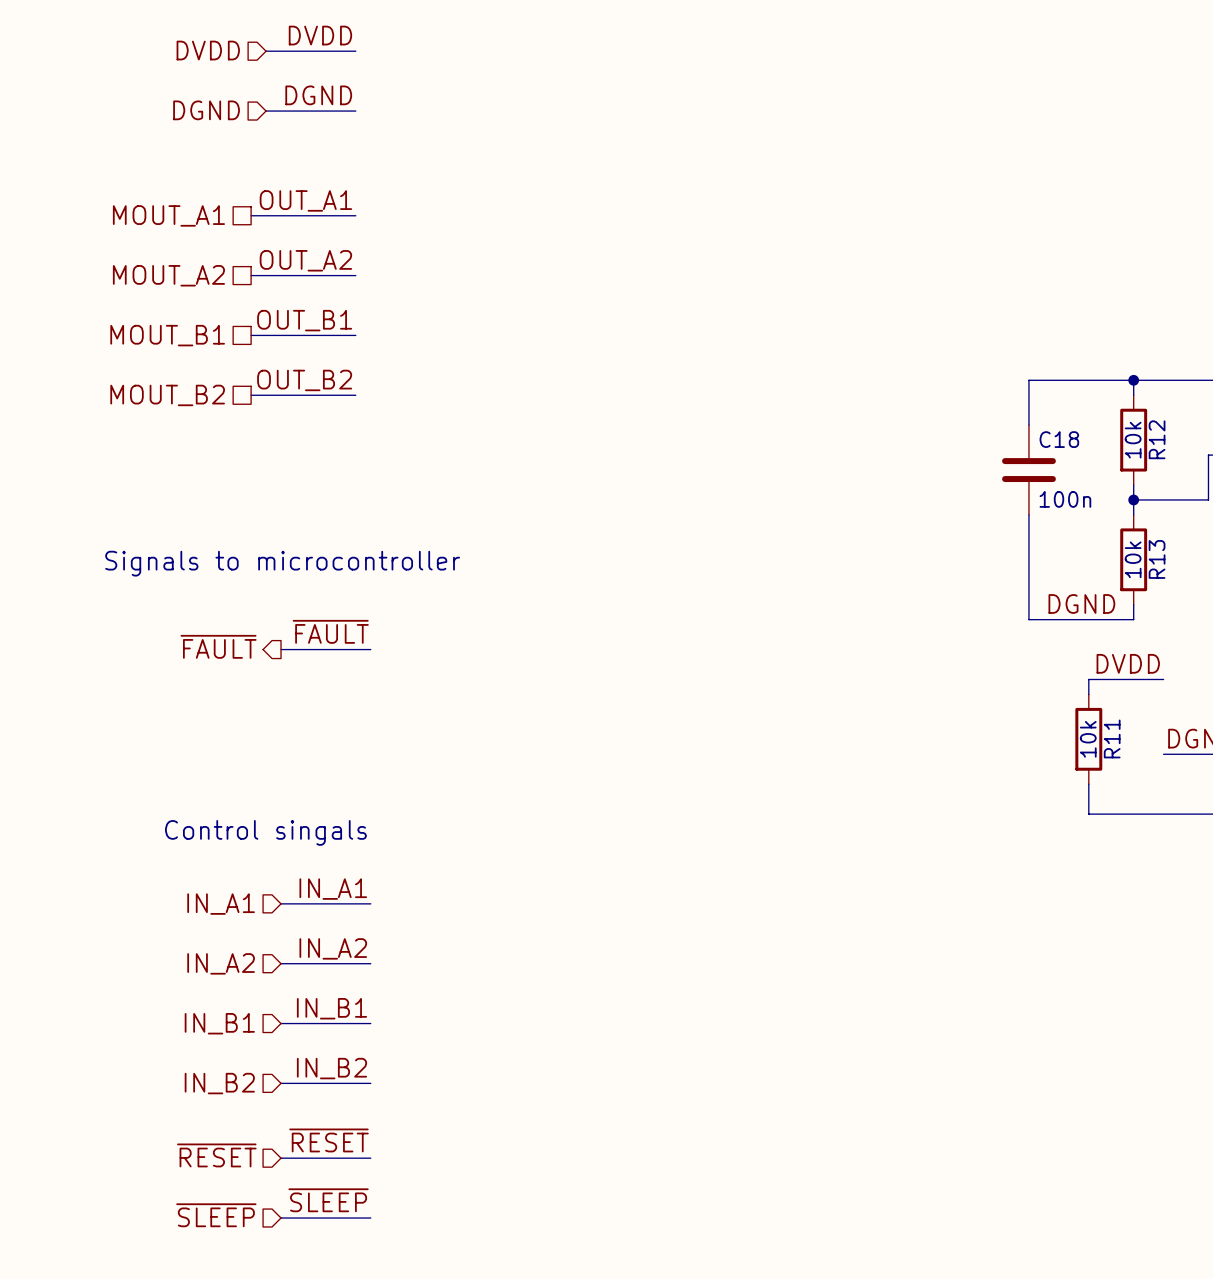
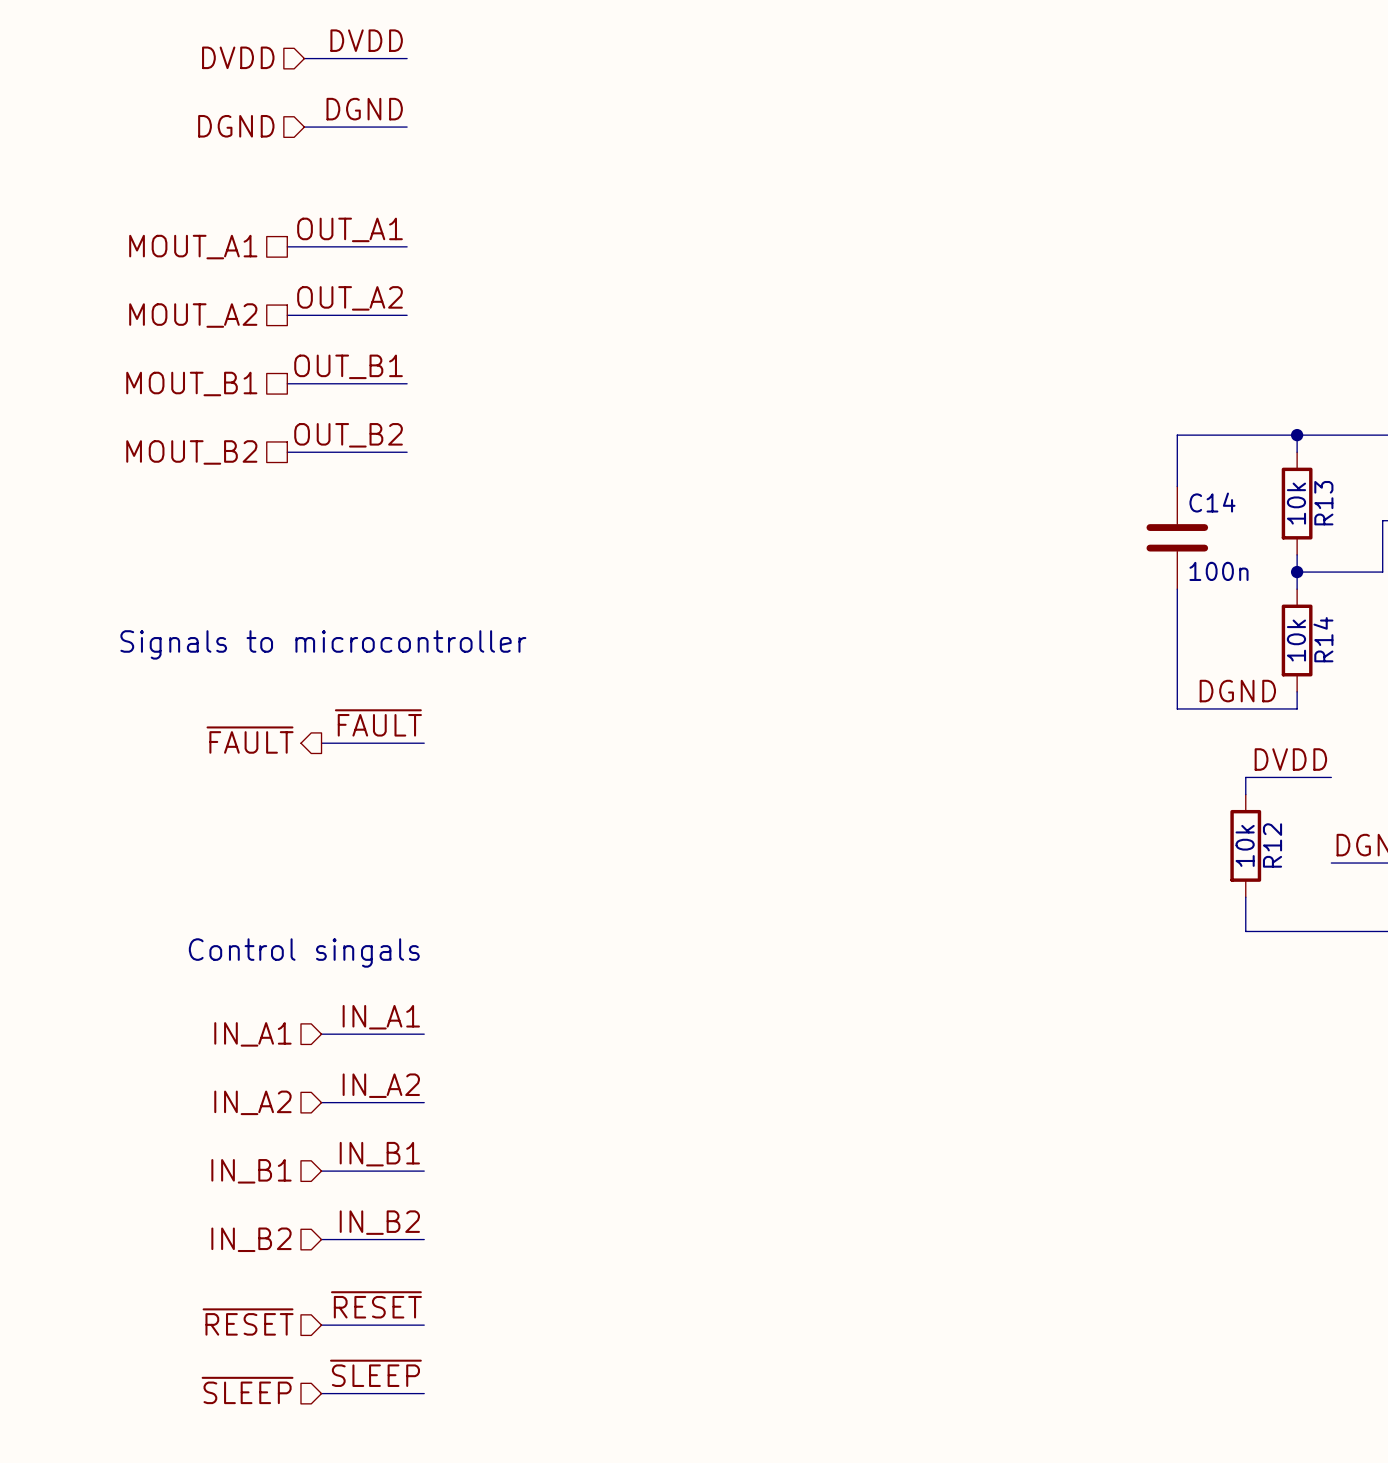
C18 name: C18 (1059, 439) -> C14 (1212, 502)
R12 name: R12 (1157, 439) -> R13 (1323, 503)
R13 name: R13 (1157, 559) -> R14 (1323, 639)
R11 name: R11 (1112, 738) -> R12 (1272, 845)

